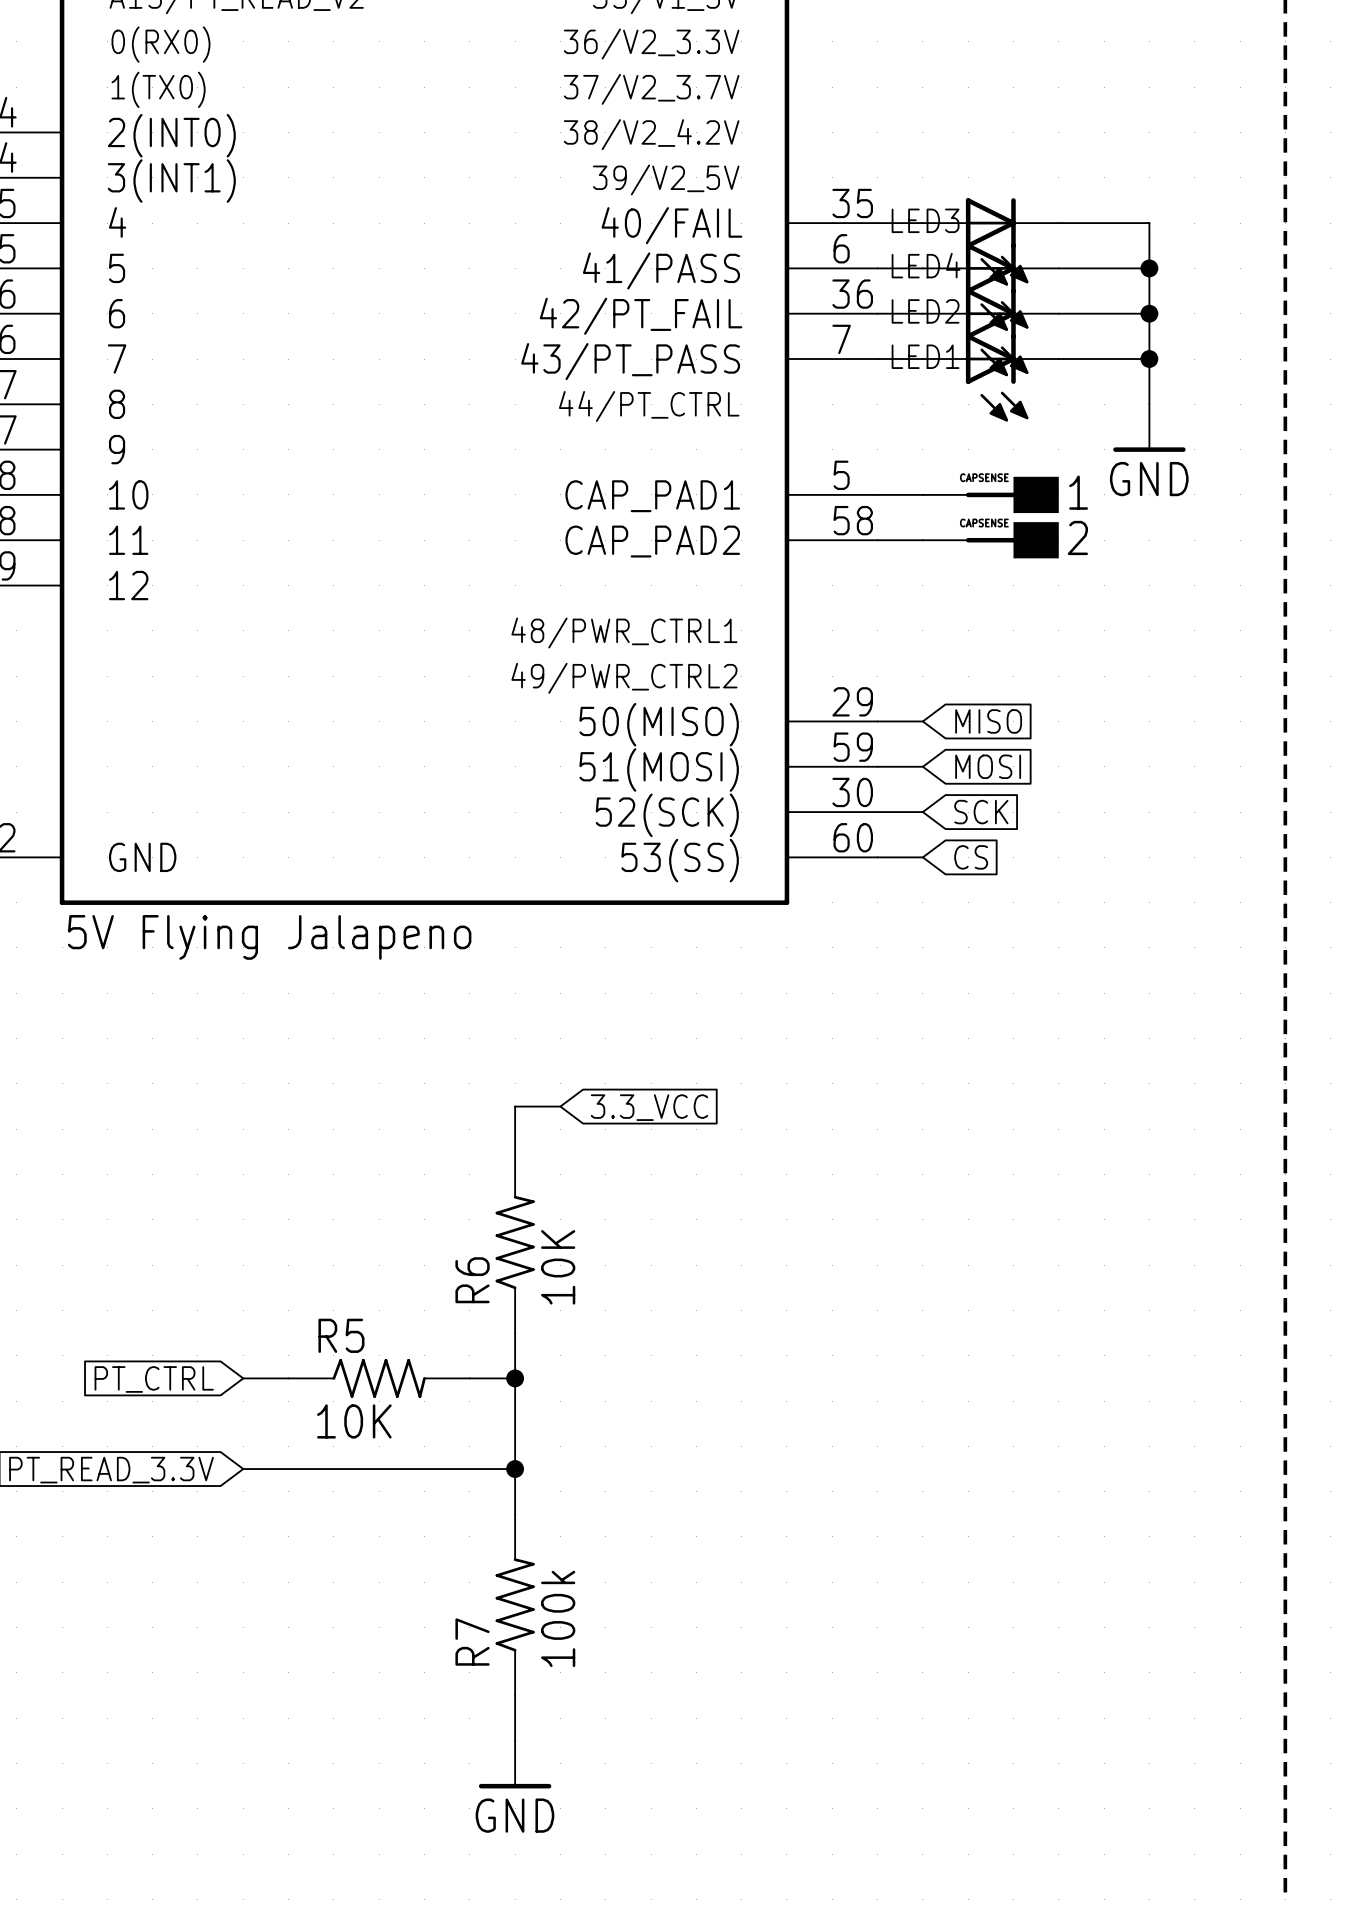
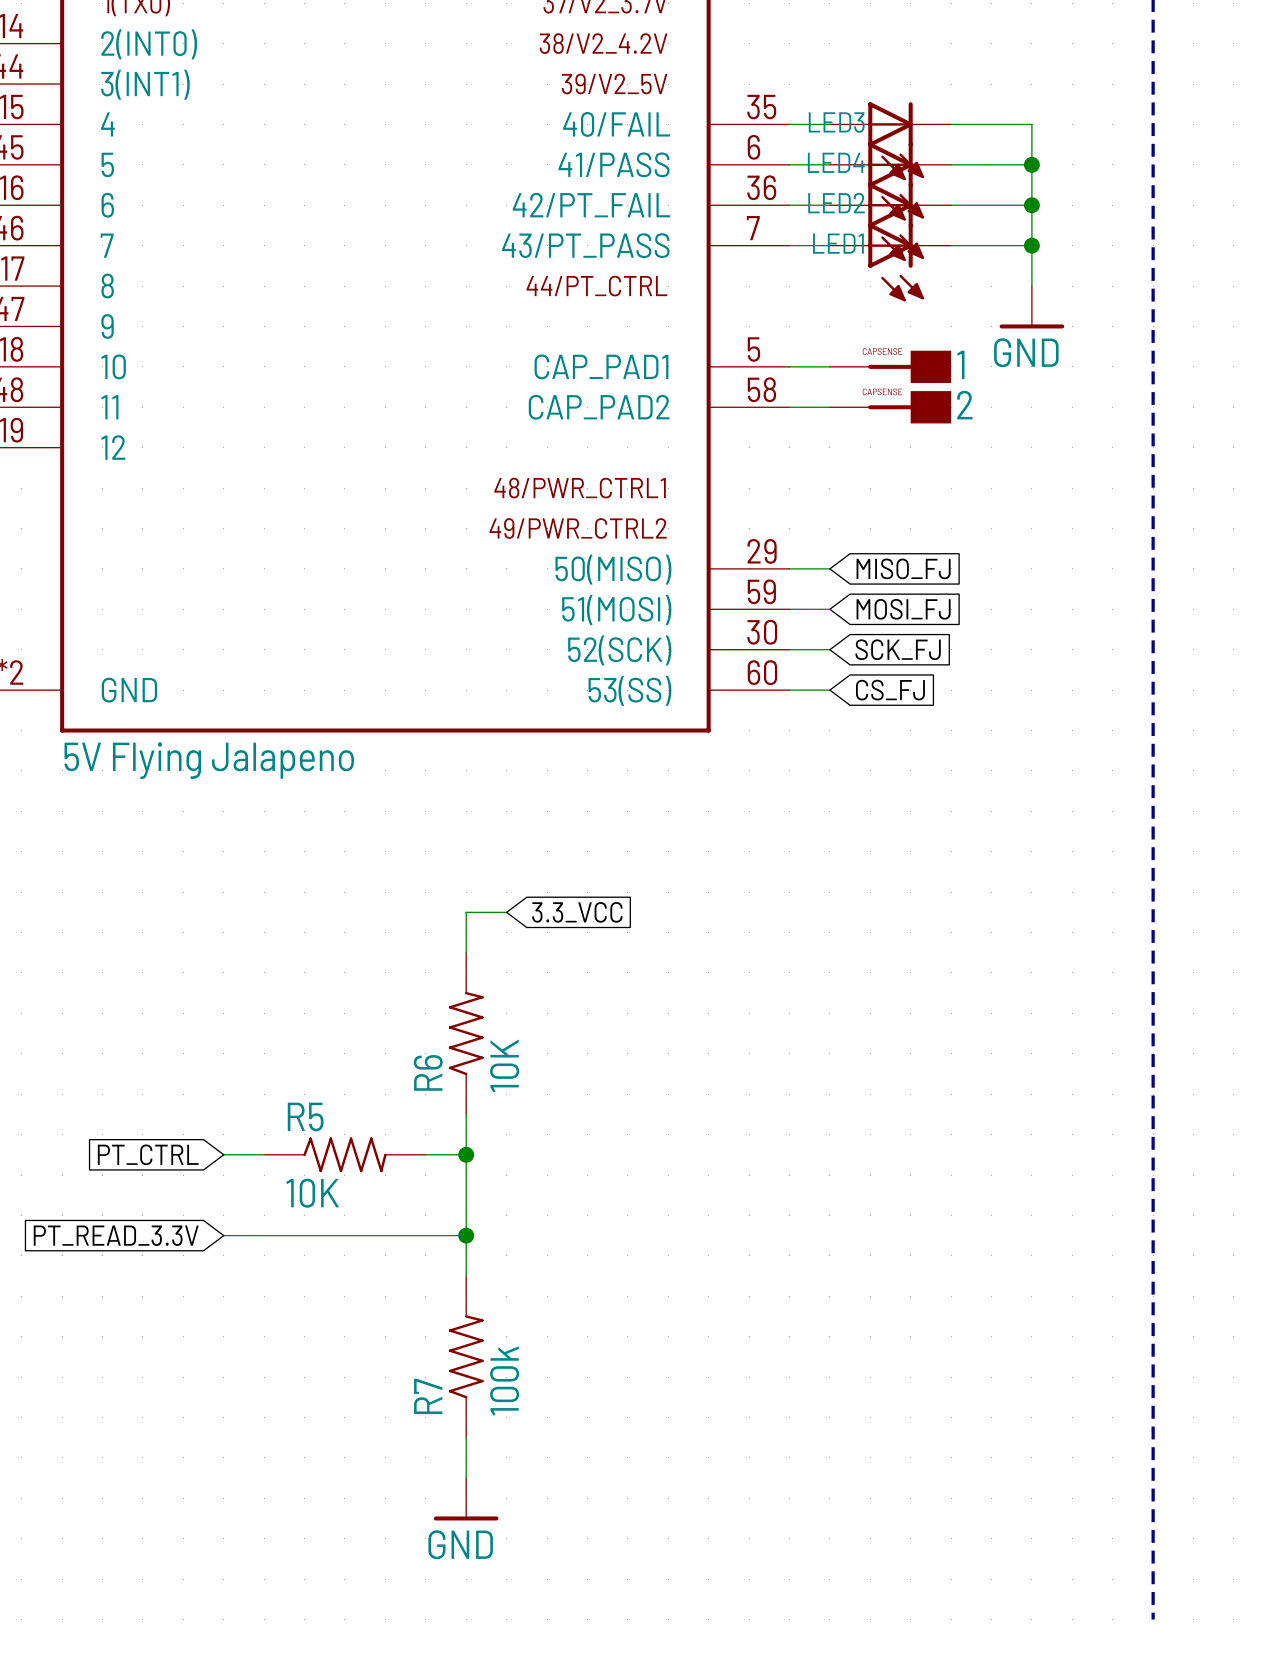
global label: MISO (988, 721) -> MISO_FJ (903, 568)
global label: MOSI (988, 766) -> MOSI_FJ (903, 609)
global label: SCK (981, 812) -> SCK_FJ (898, 649)
global label: CS (971, 857) -> CS_FJ (890, 690)

